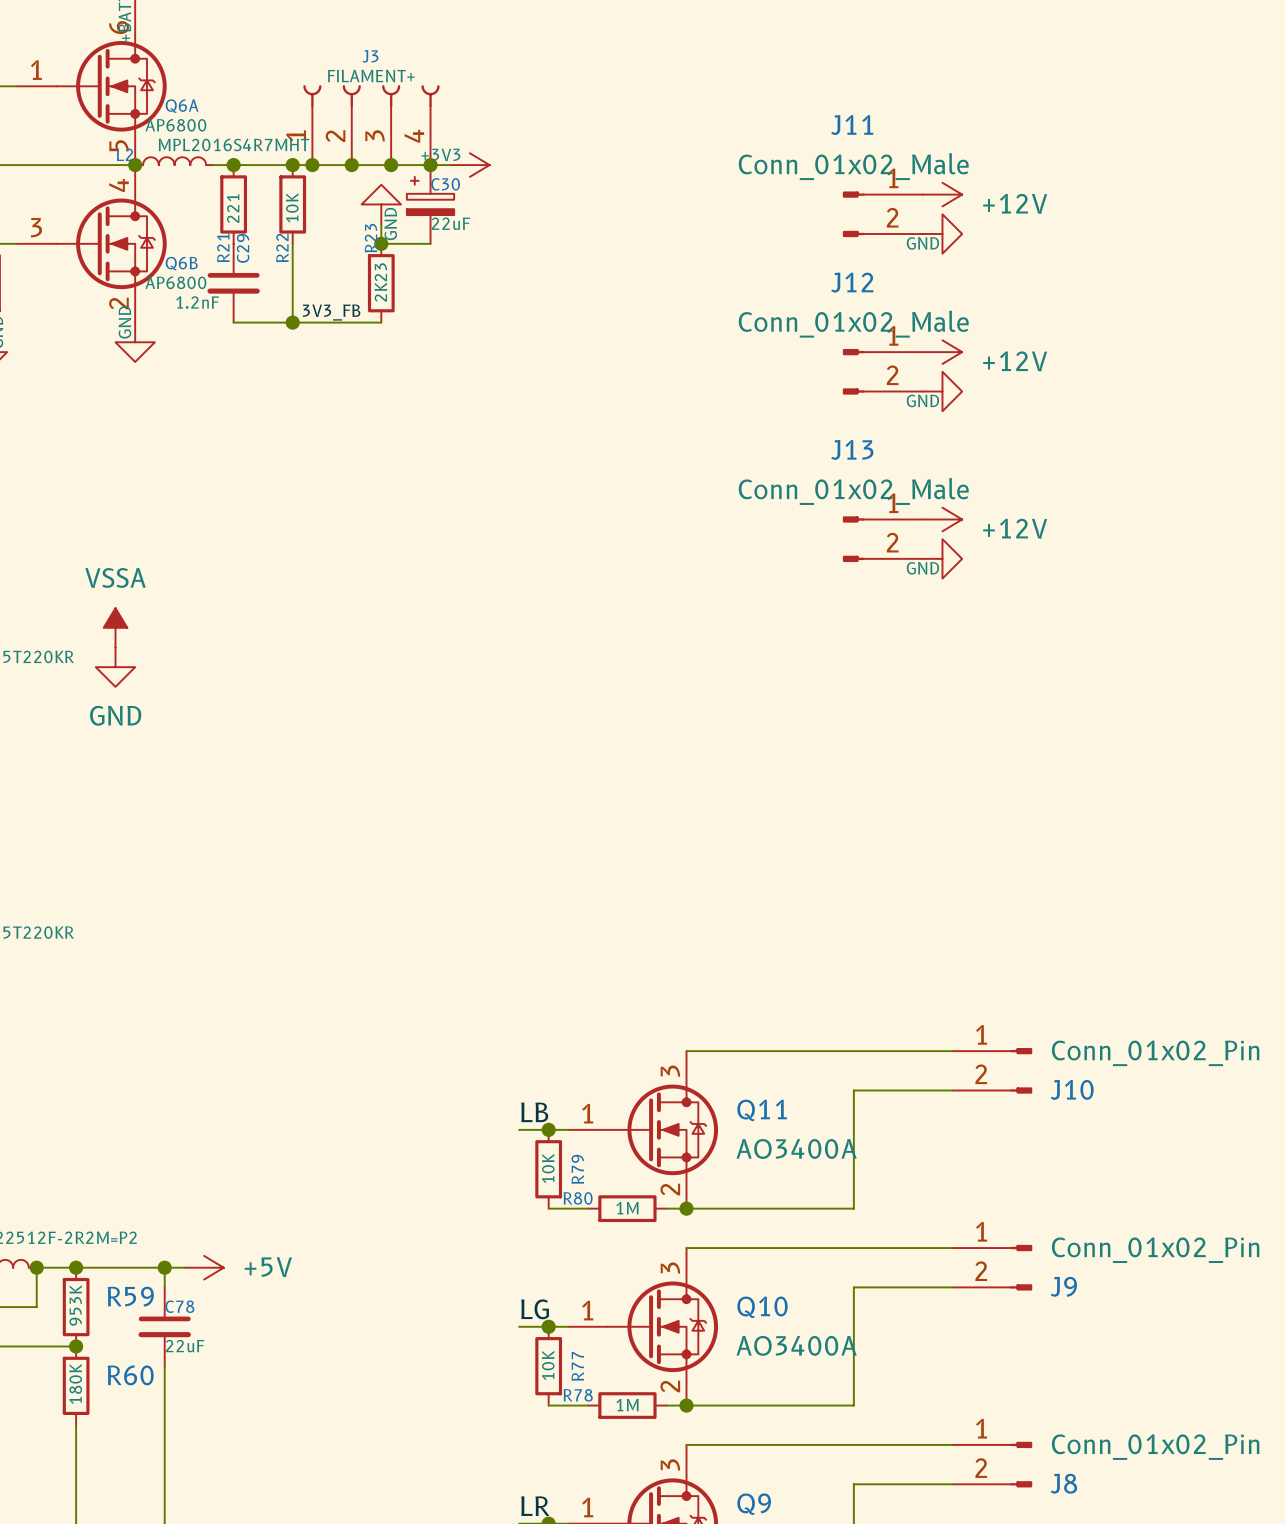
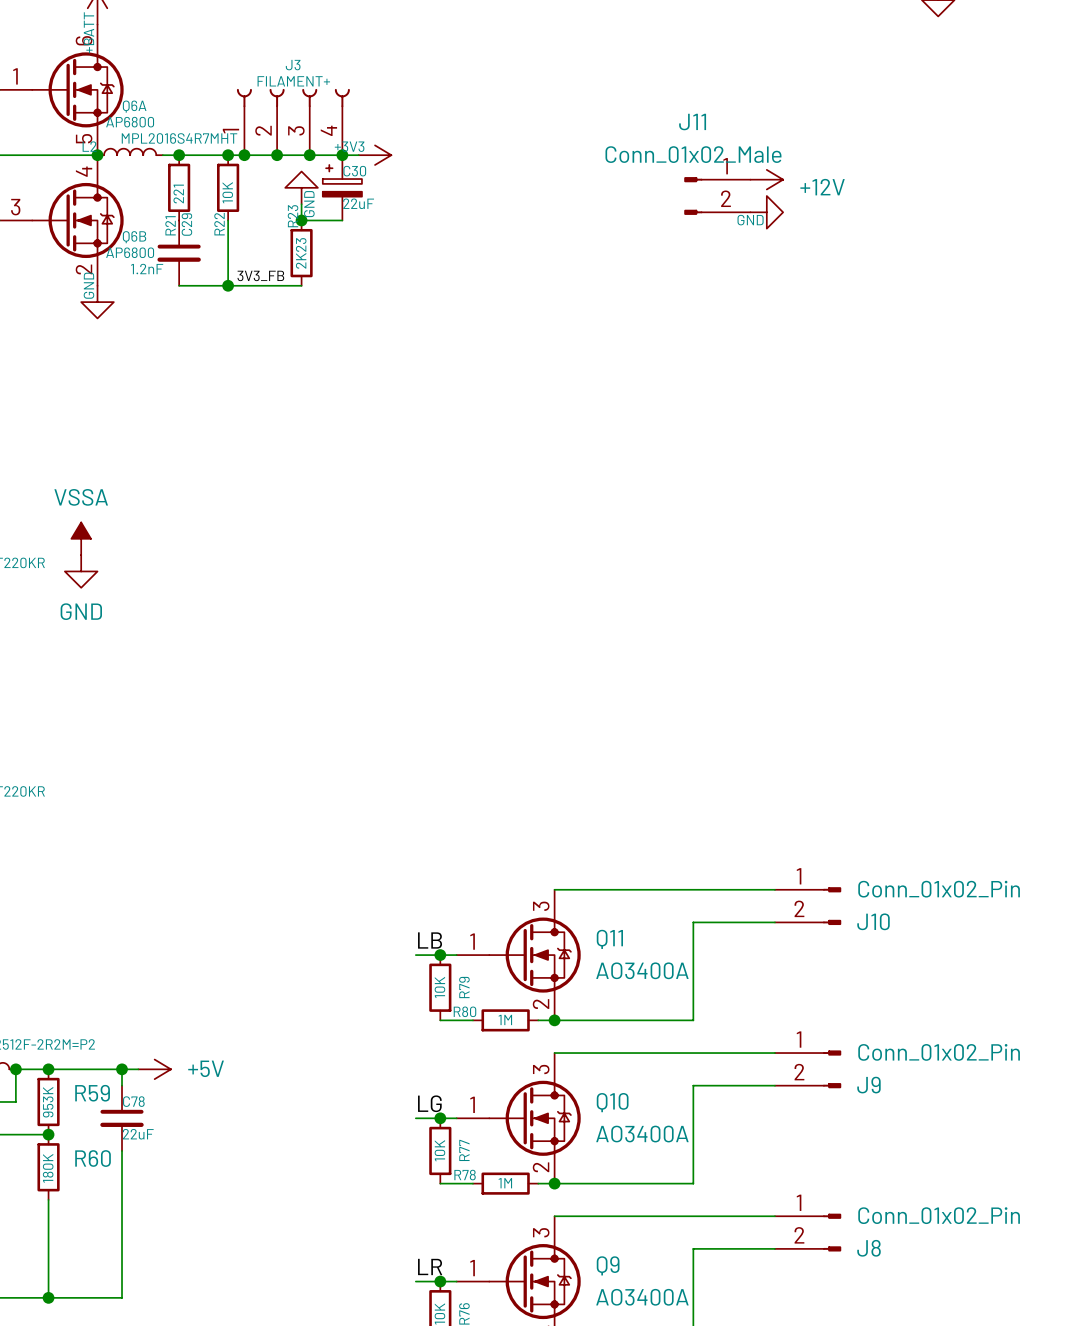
power symbol: +12V (942, 352) -> none
J12: Conn_01x02_Male (882, 371) -> none
power symbol: GND (942, 391) -> none
power symbol: +12V (942, 519) -> none
J13: Conn_01x02_Male (882, 539) -> none
power symbol: GND (942, 558) -> none

